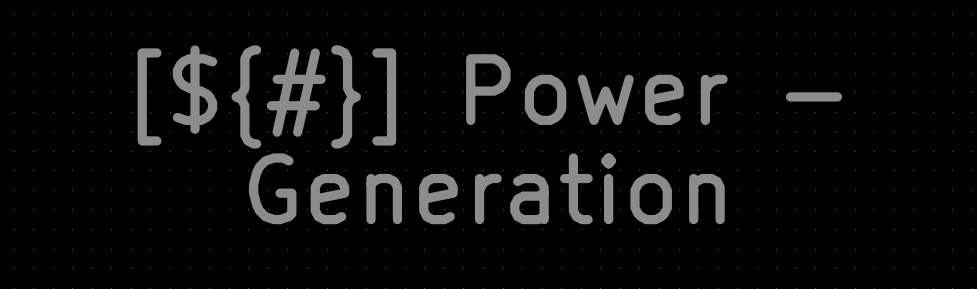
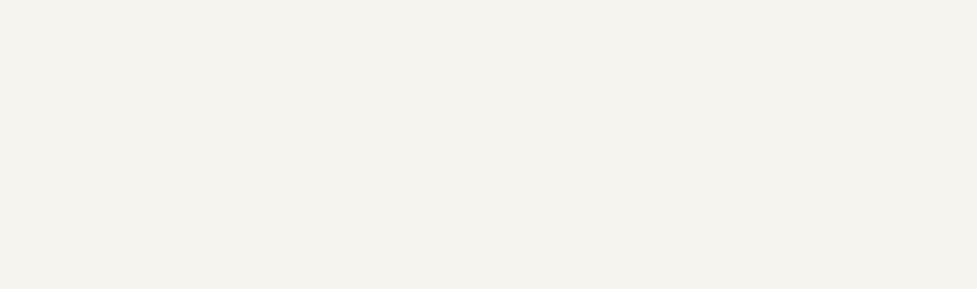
text: [${#}] Power - (489, 96) -> none
text: Generation (486, 188) -> none

